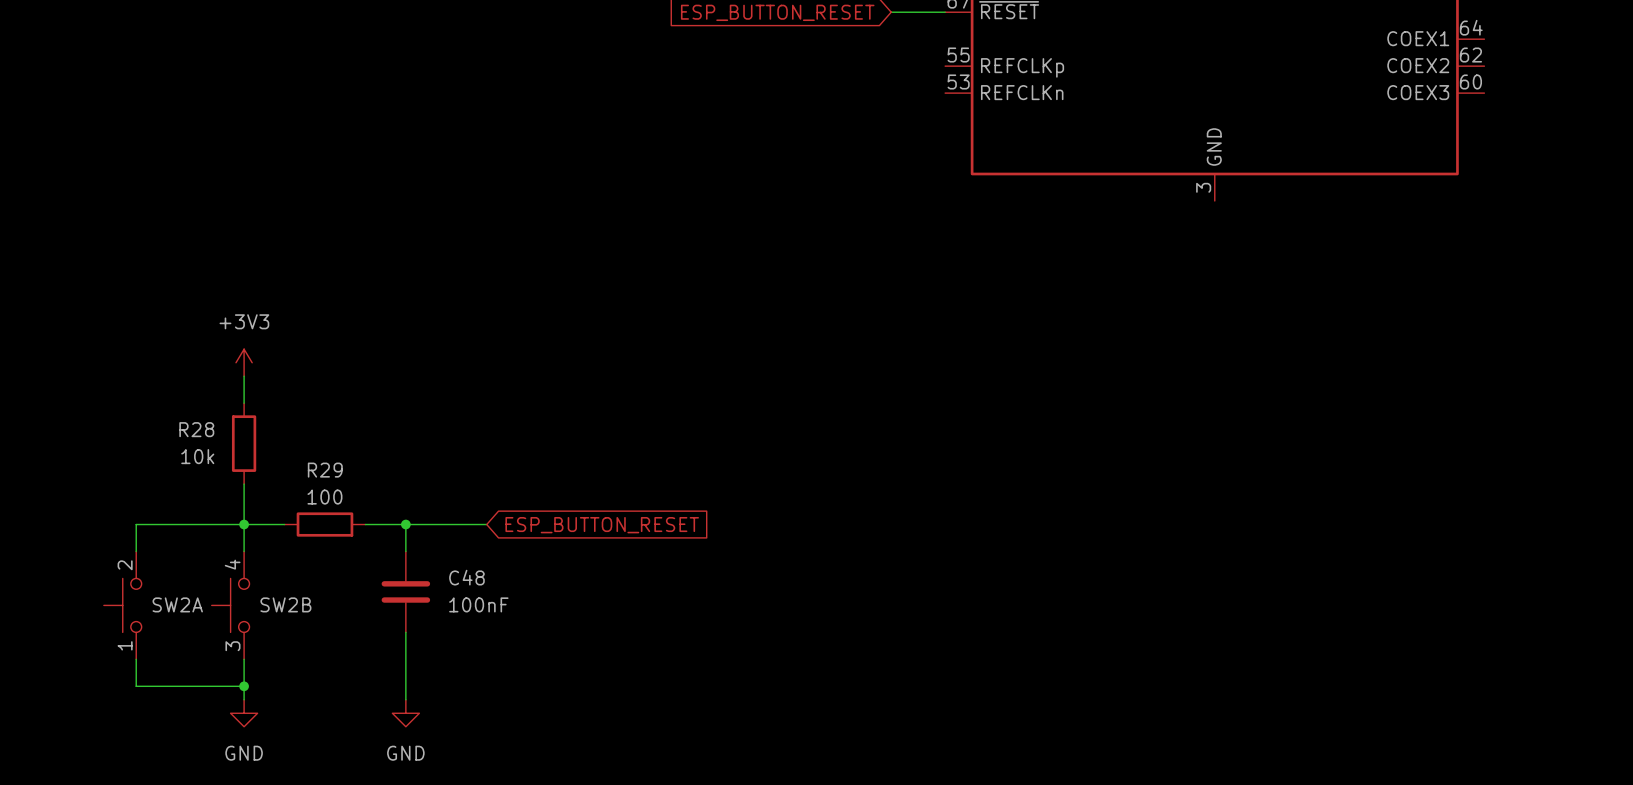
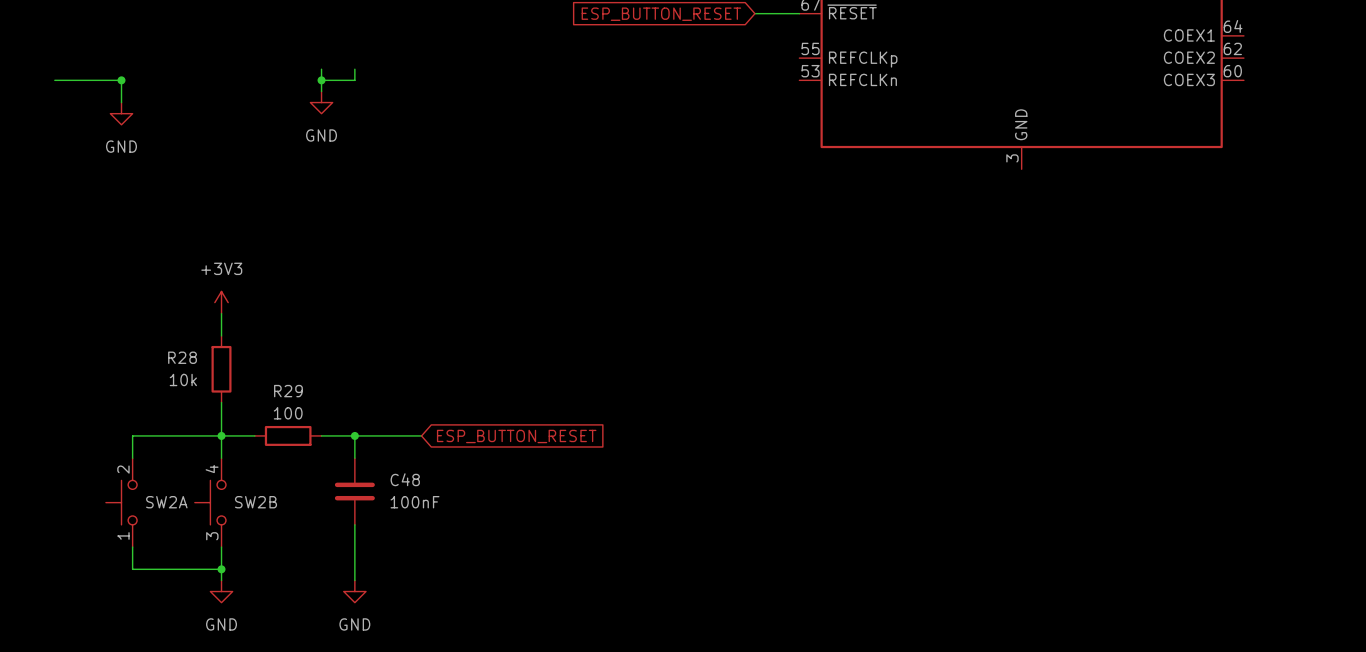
wire: none -> (321, 69) (321, 91)
wire: none -> (354, 69) (354, 80) (321, 80)
wire: none -> (54, 80) (121, 80) (121, 102)
junction: none -> (121, 80)
junction: none -> (321, 80)
power symbol: none -> GND (321, 102)
power symbol: none -> GND (121, 113)

